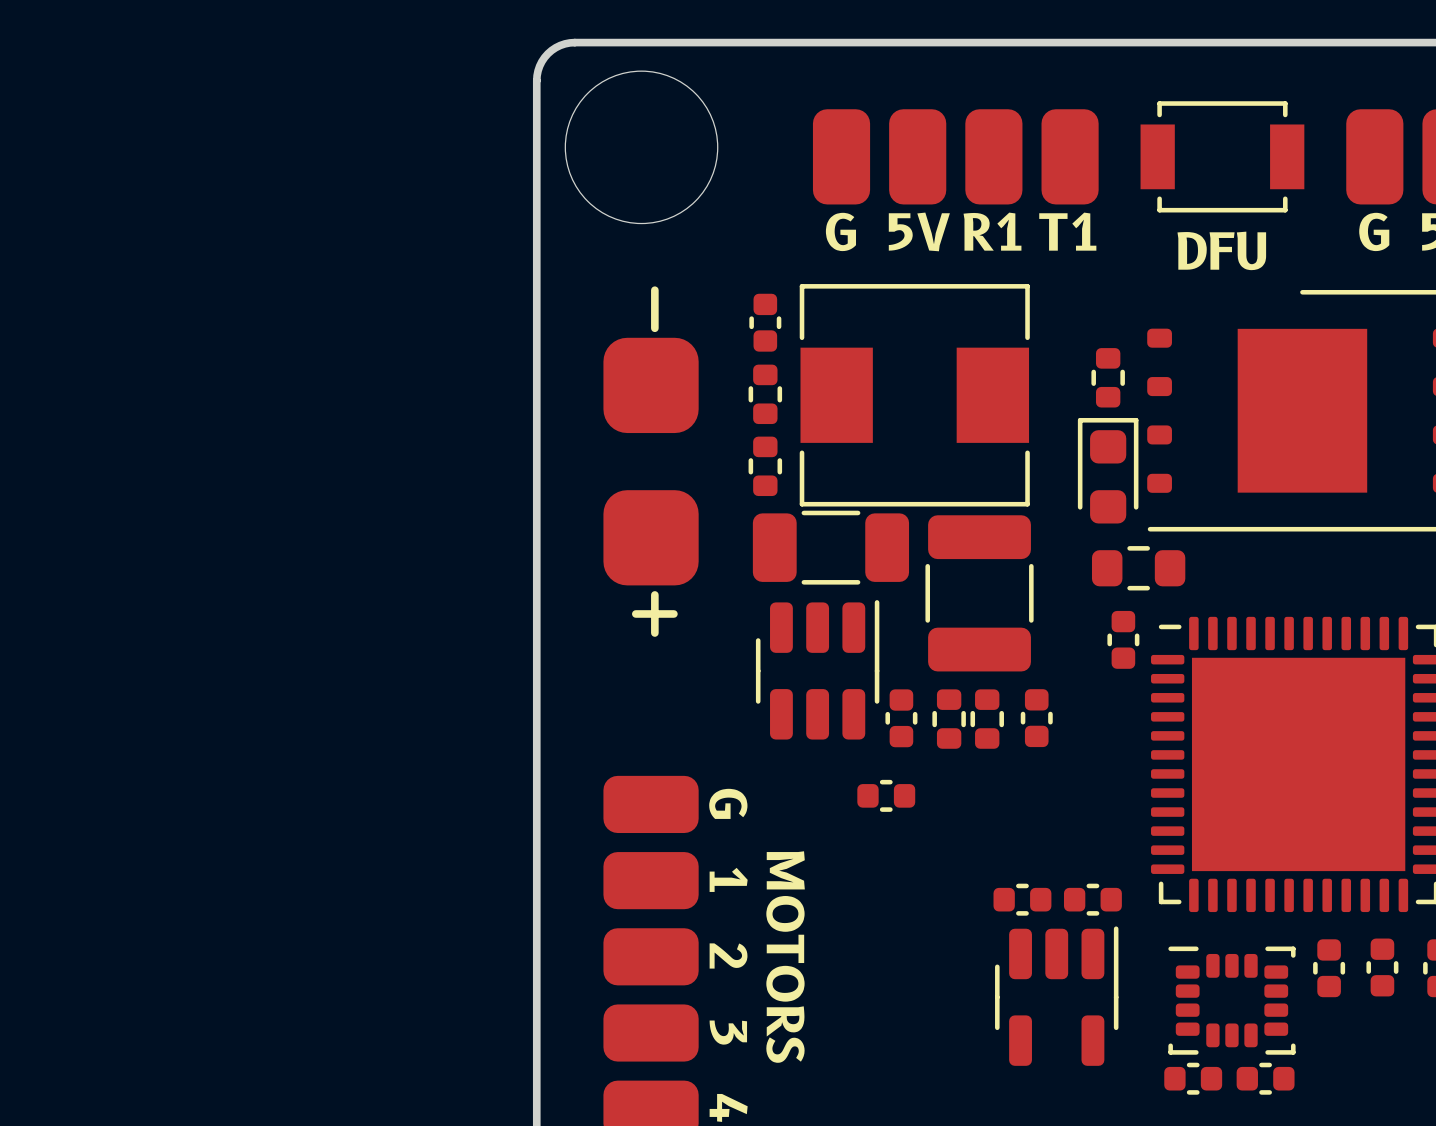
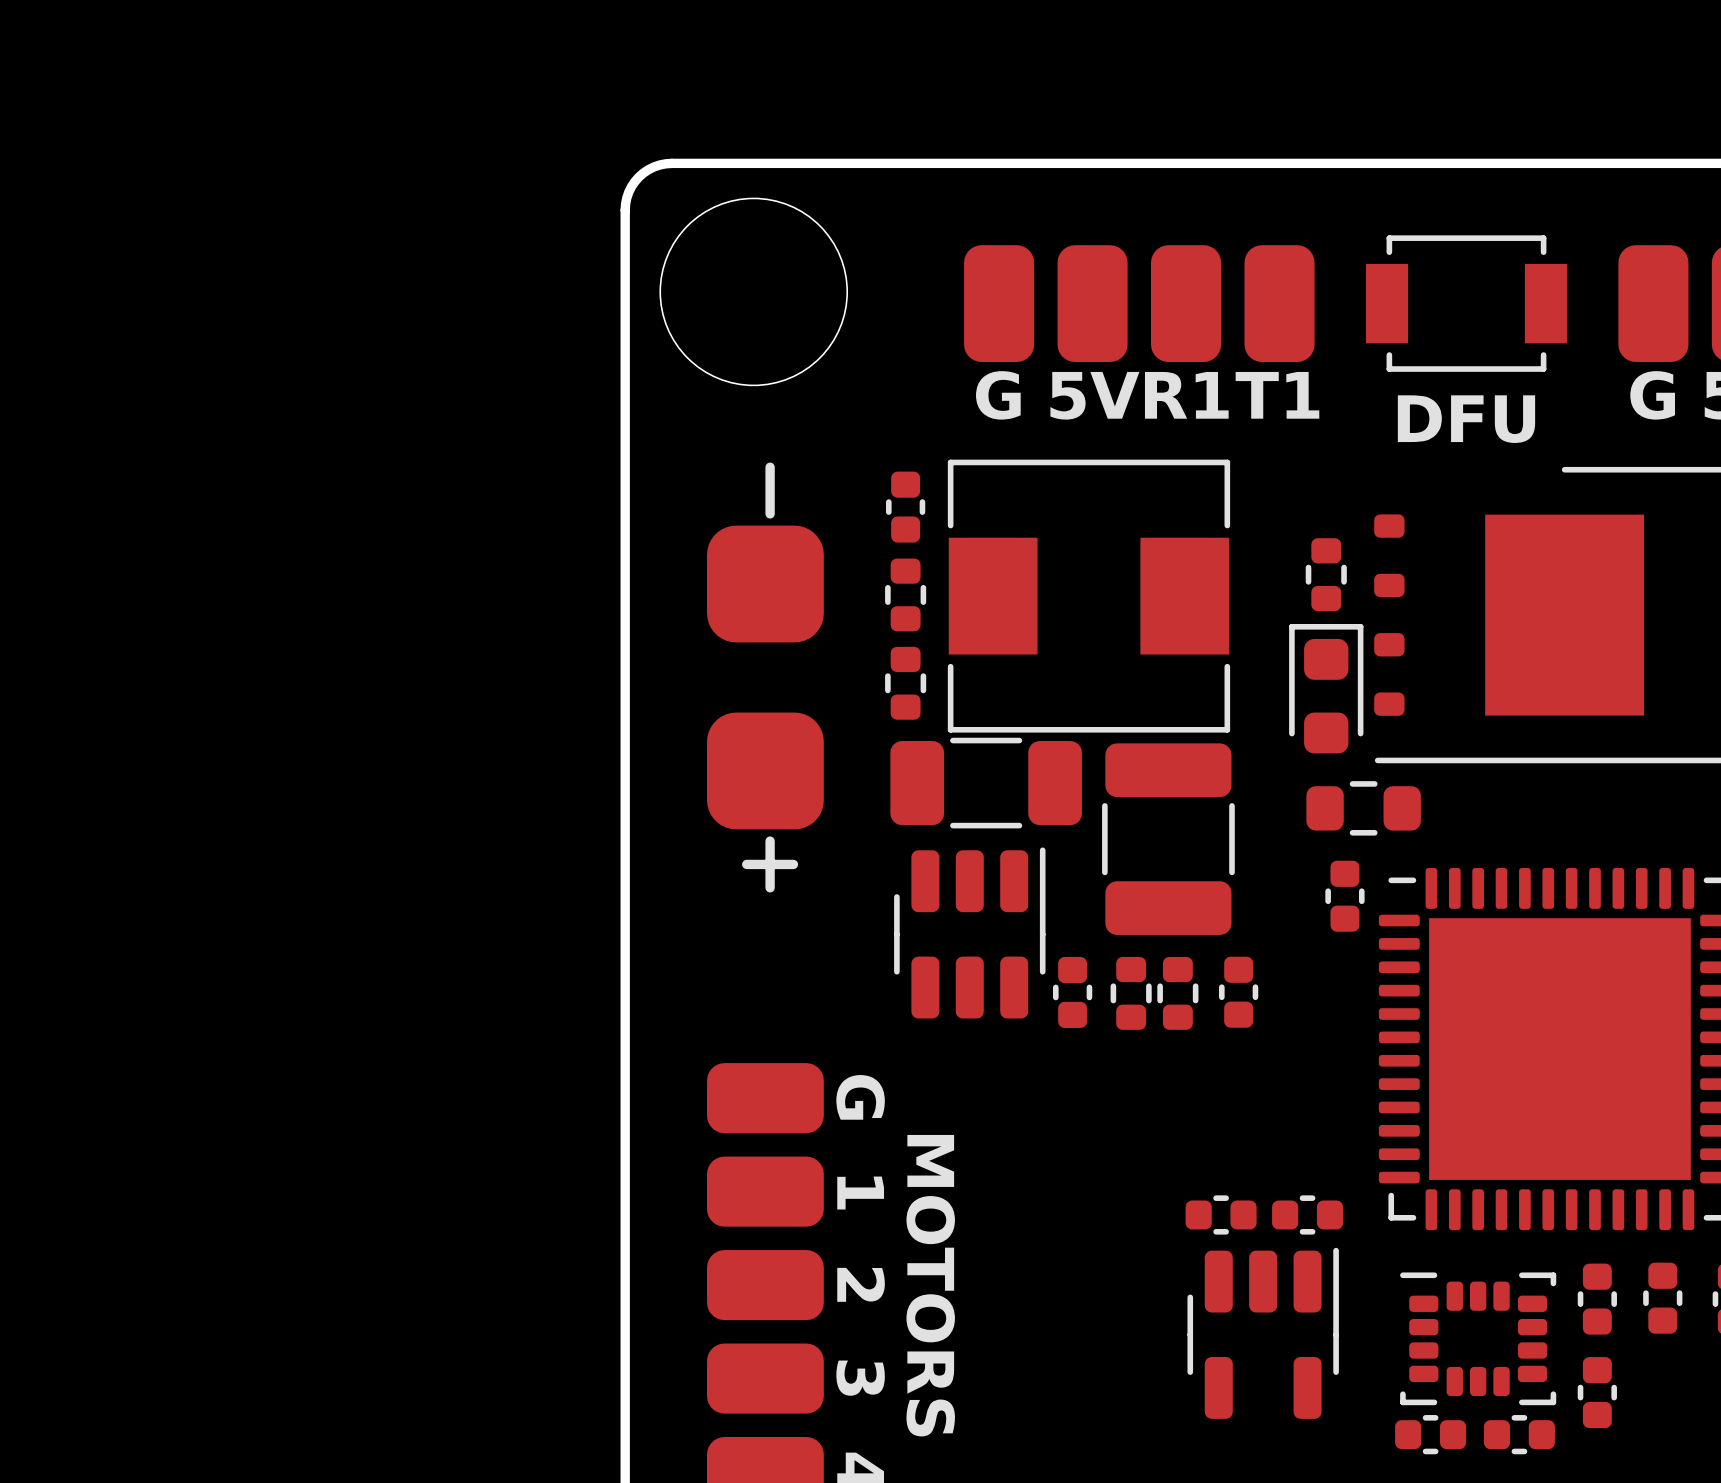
part rotation: 0° (886, 795) -> 90° clockwise (1597, 1392)
part position: (886, 795) -> (1597, 1392)

